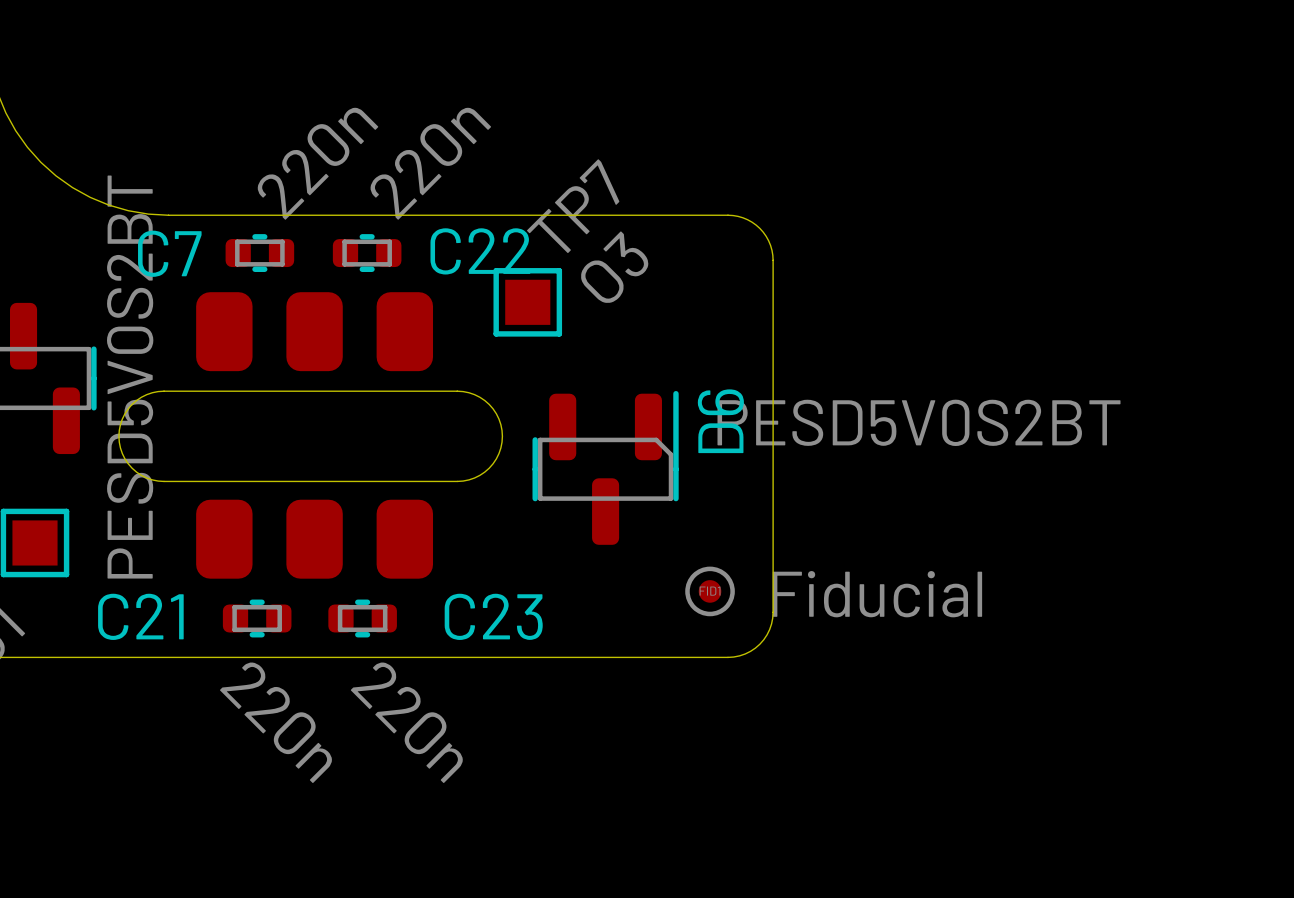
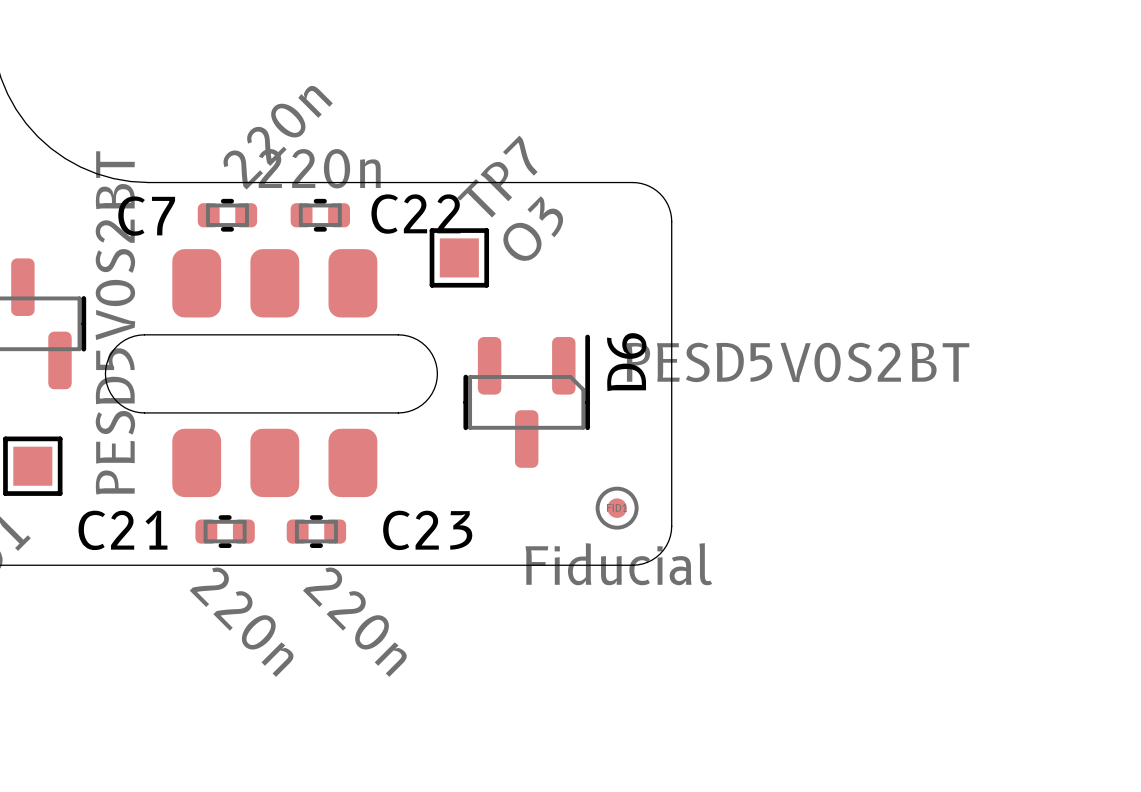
C22 value rotation: 0° (430, 163) -> 45° clockwise (319, 168)
FID1 value position: Fiducial (877, 594) -> Fiducial (618, 564)

